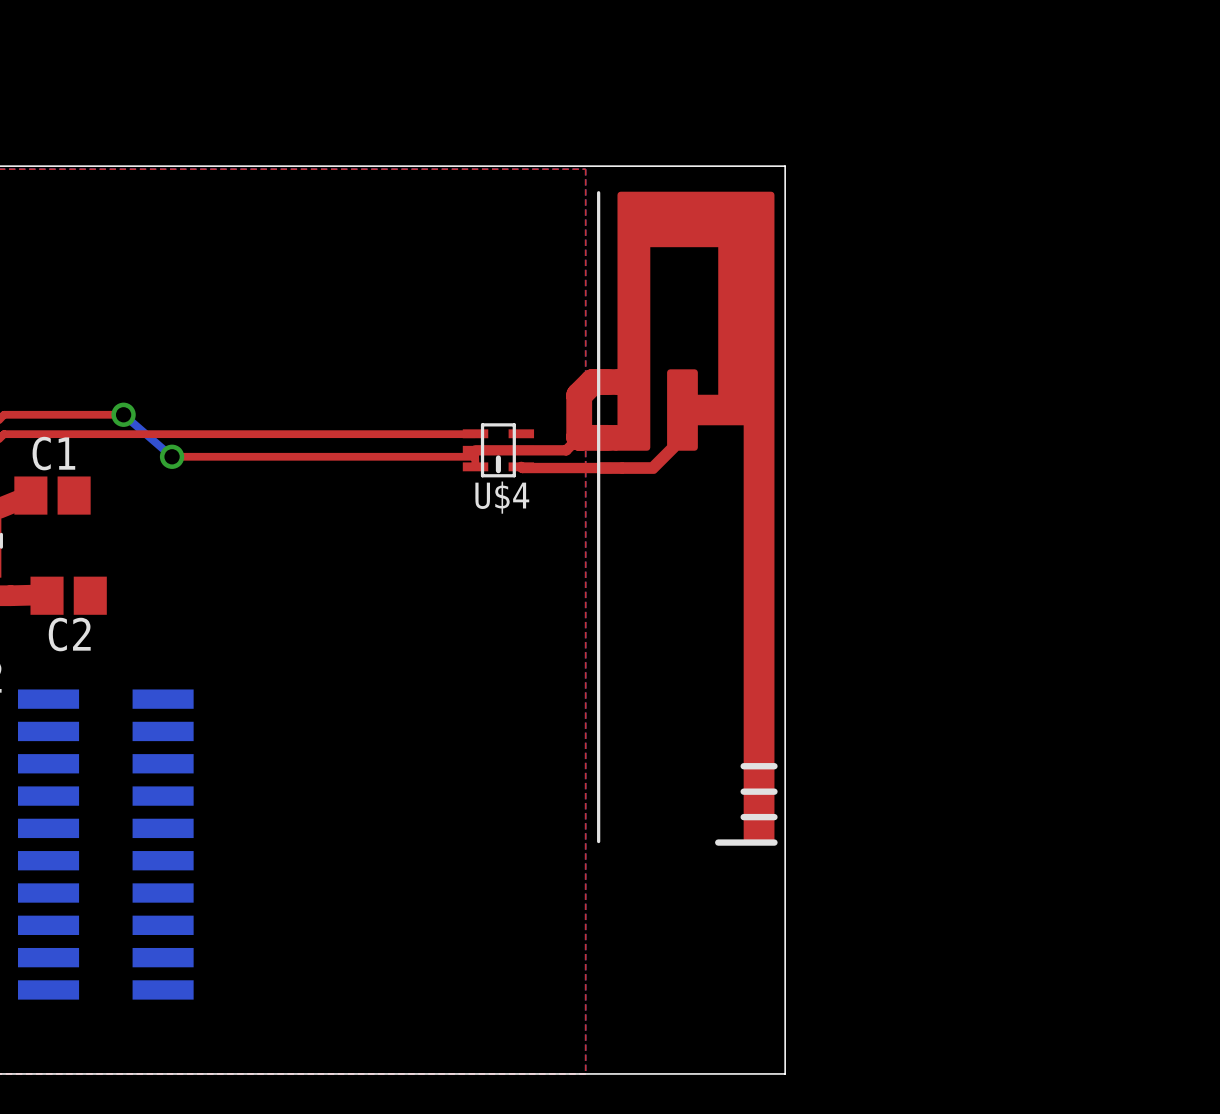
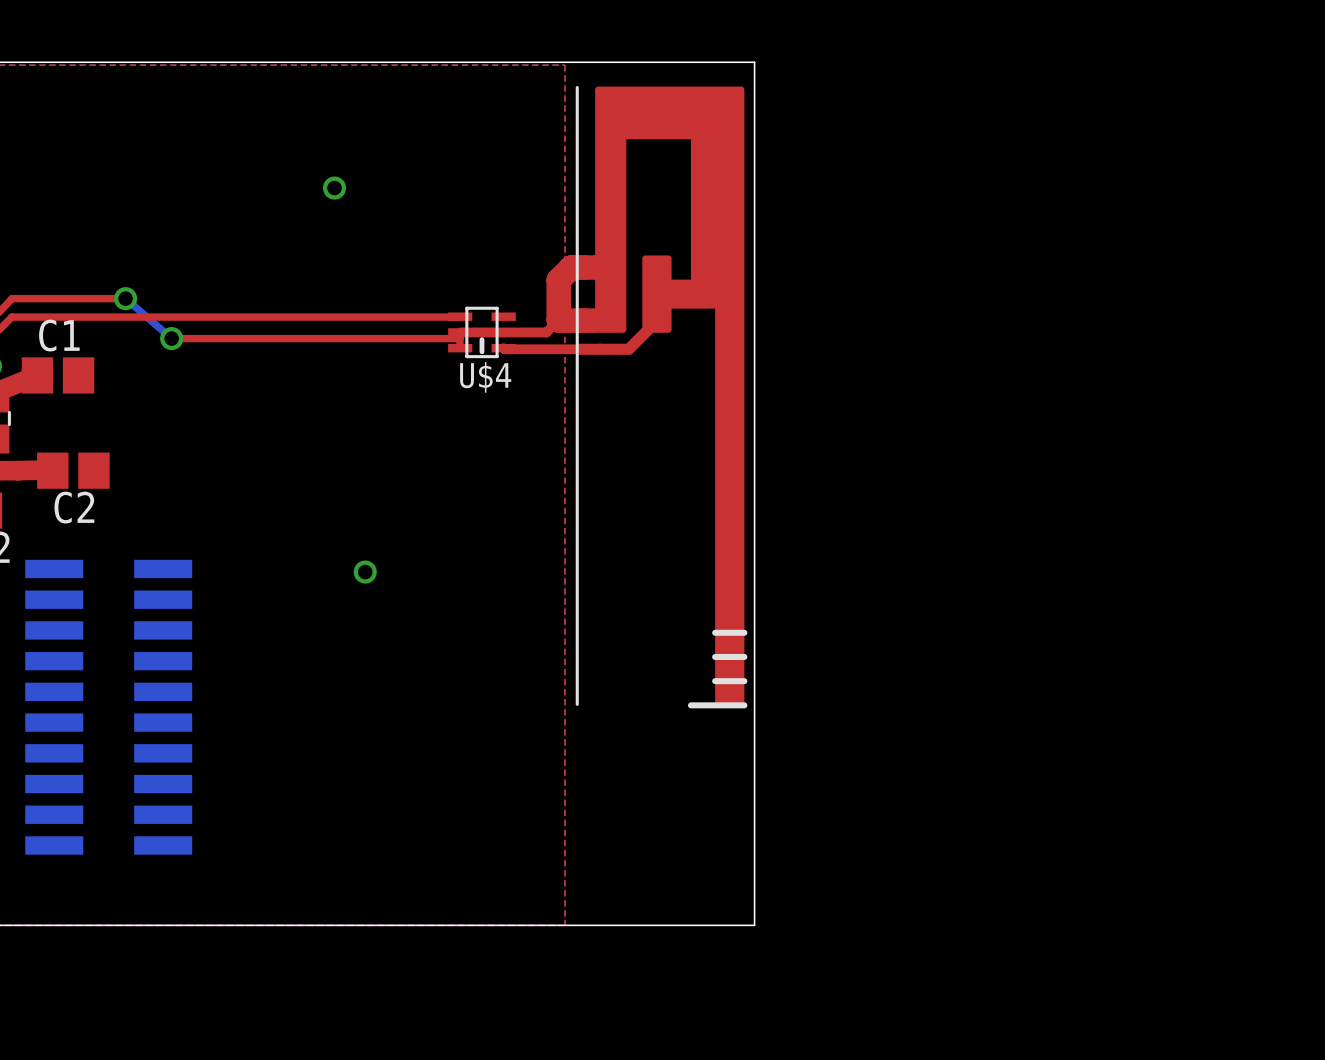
via: none -> (334, 188)
via: none -> (365, 572)

